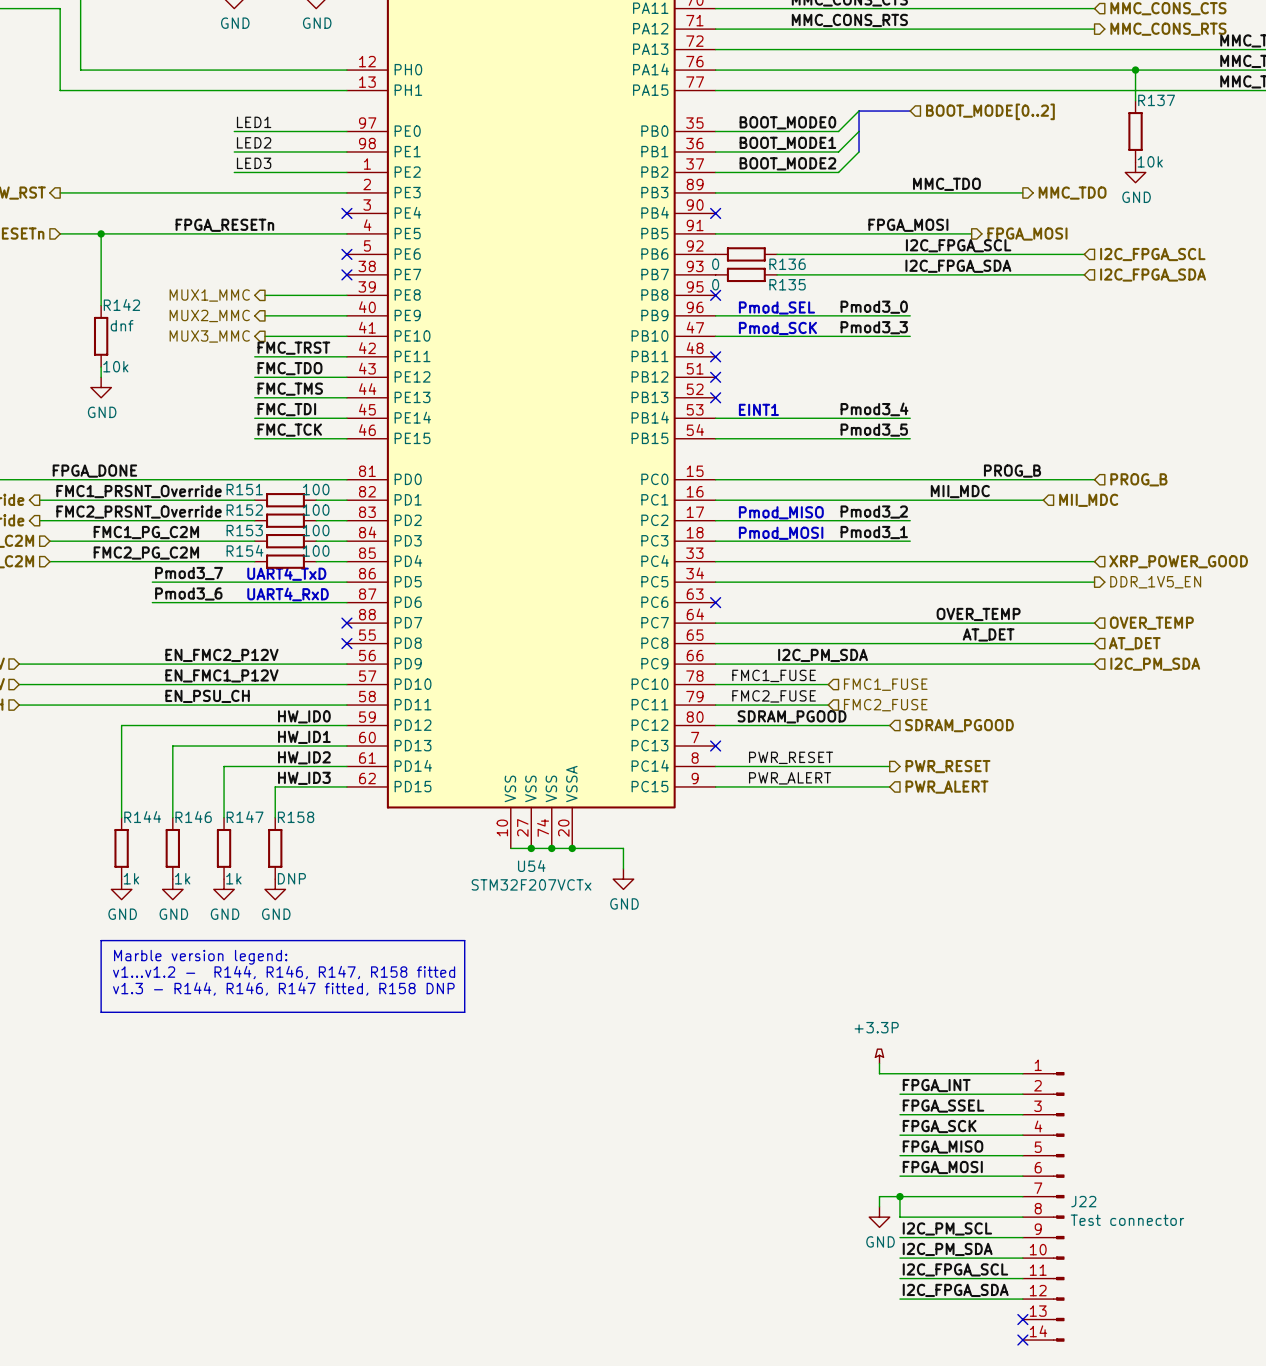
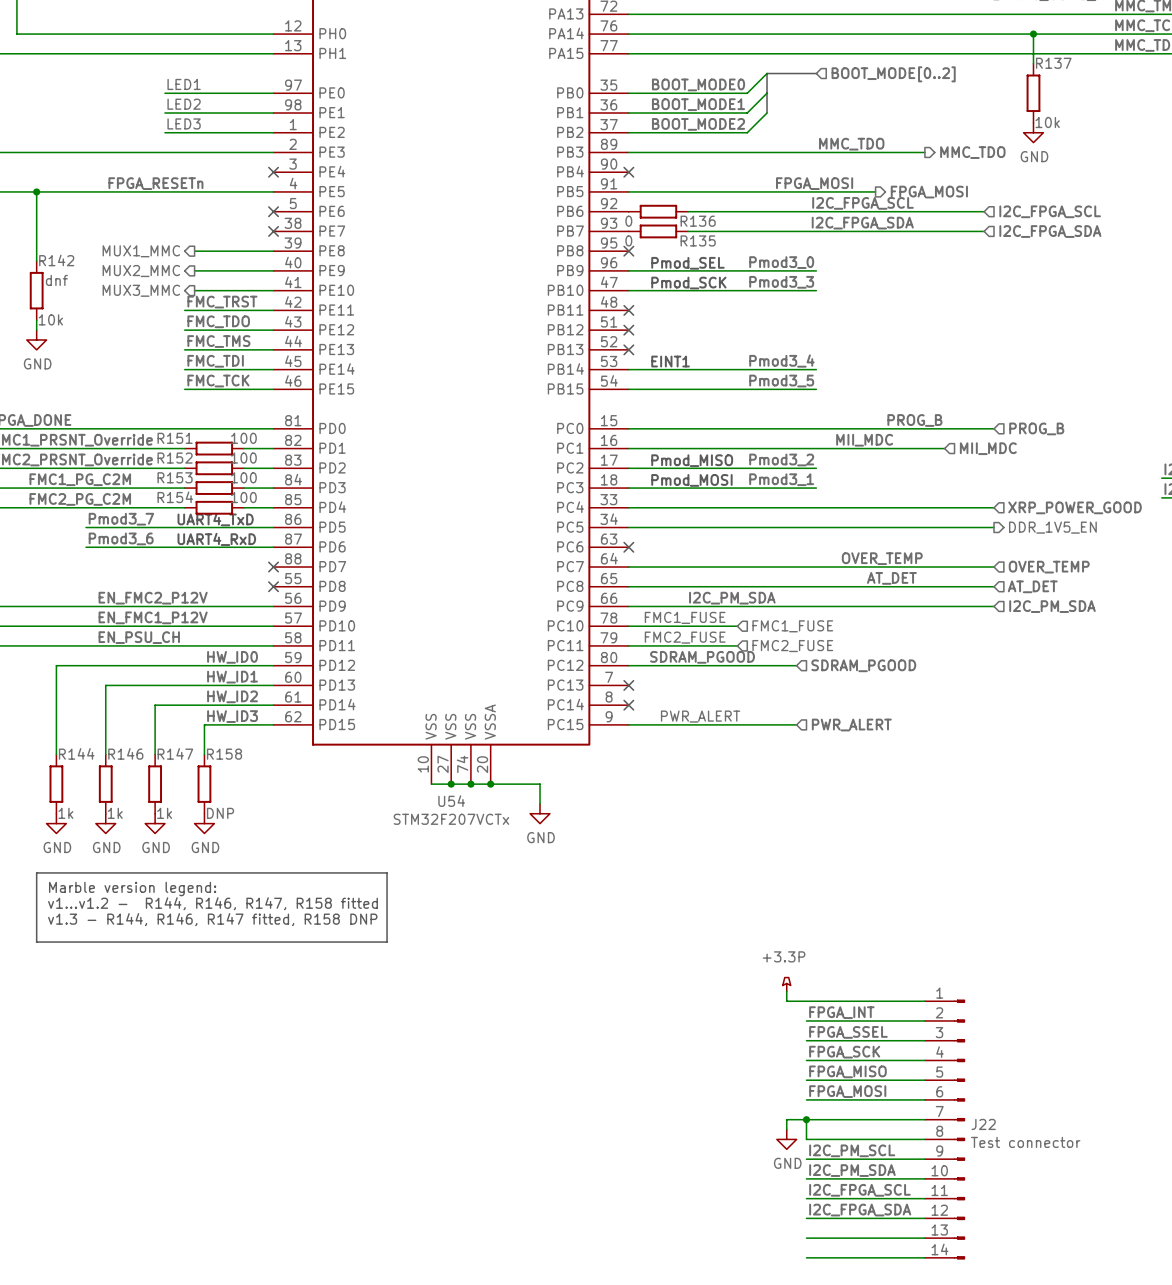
label: PWR_RESET (791, 757) -> none
wire: (715, 766) (889, 766) -> none
no-connect mark: none -> (628, 705)
hierarchical label: PWR_RESET (947, 766) -> none
wire: none -> (806, 1238) (924, 1238)
no-connect mark: (1022, 1319) -> none
wire: none -> (806, 1257) (924, 1257)
no-connect mark: (1022, 1340) -> none

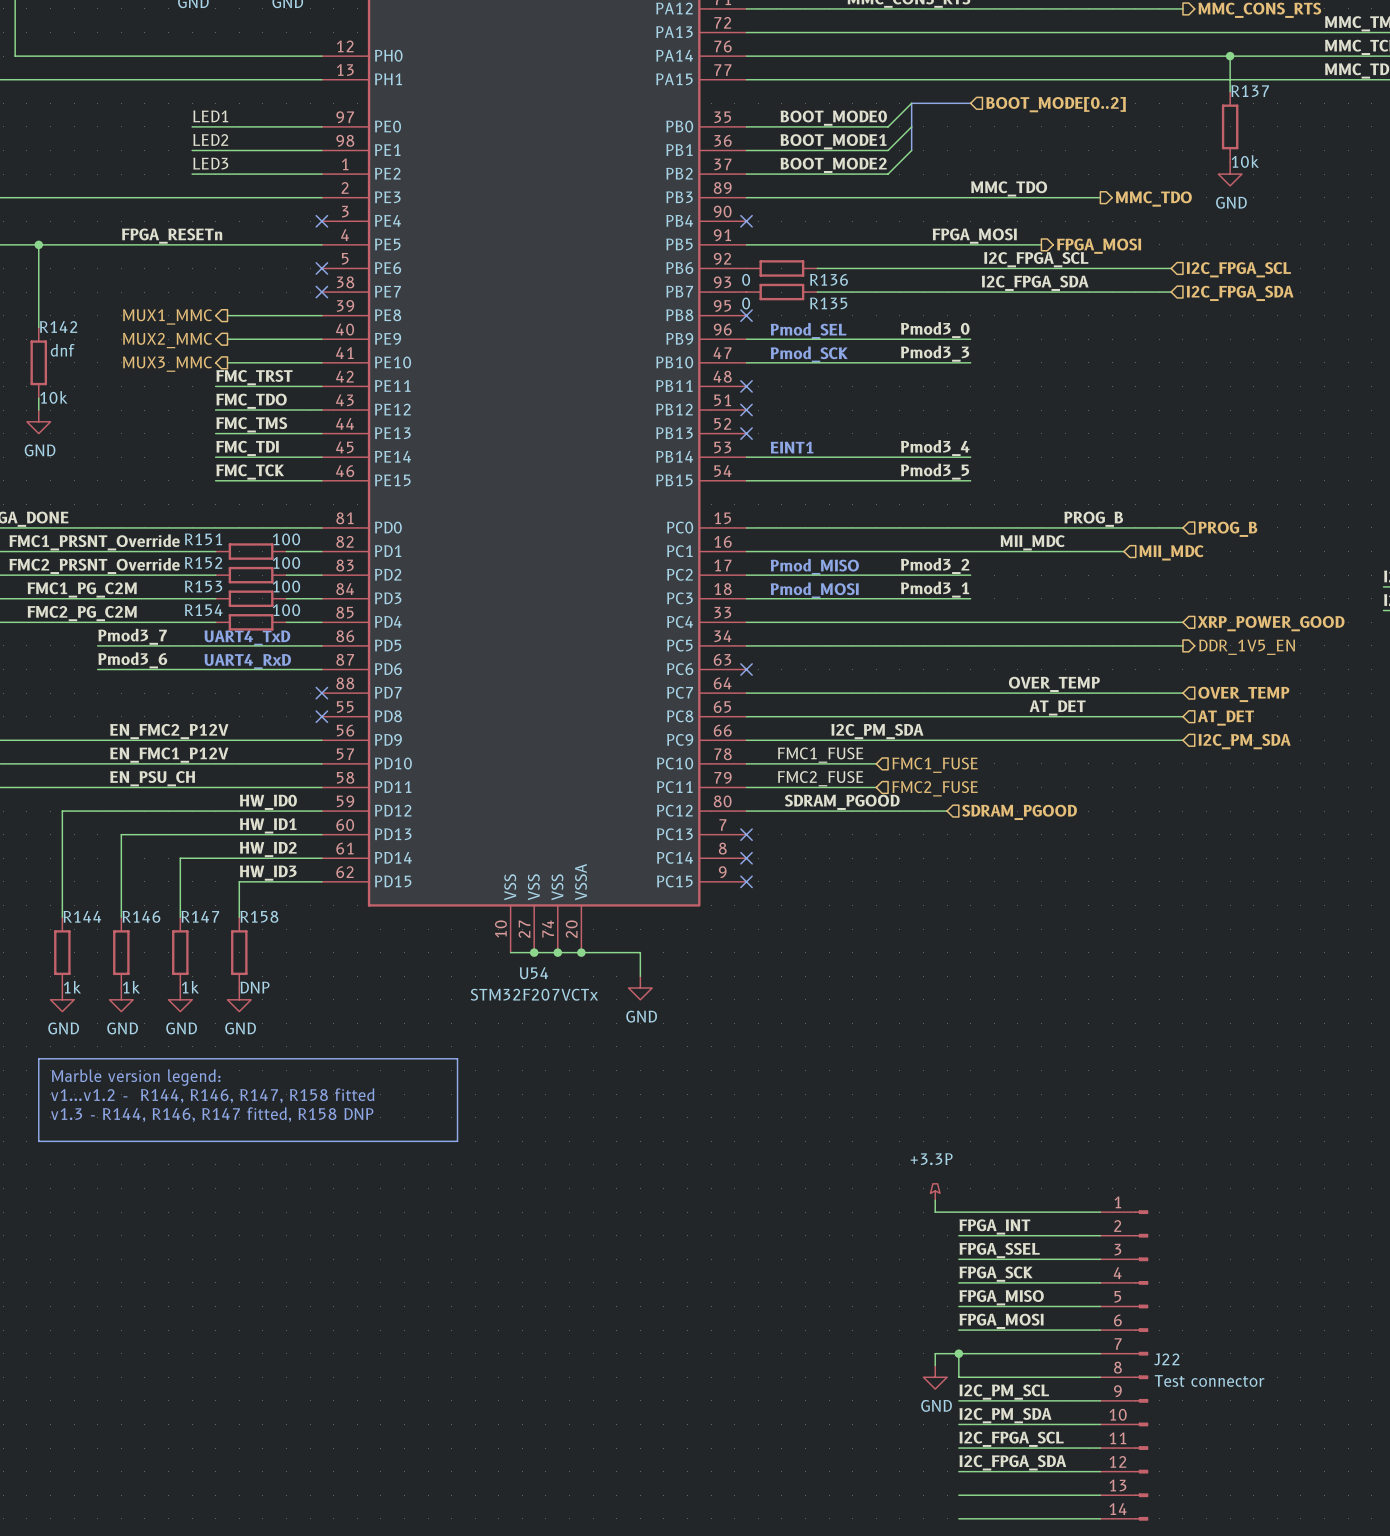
label: PWR_ALERT (700, 716) -> none
wire: (628, 724) (796, 724) -> none
no-connect mark: none -> (746, 881)
hierarchical label: PWR_ALERT (851, 725) -> none

